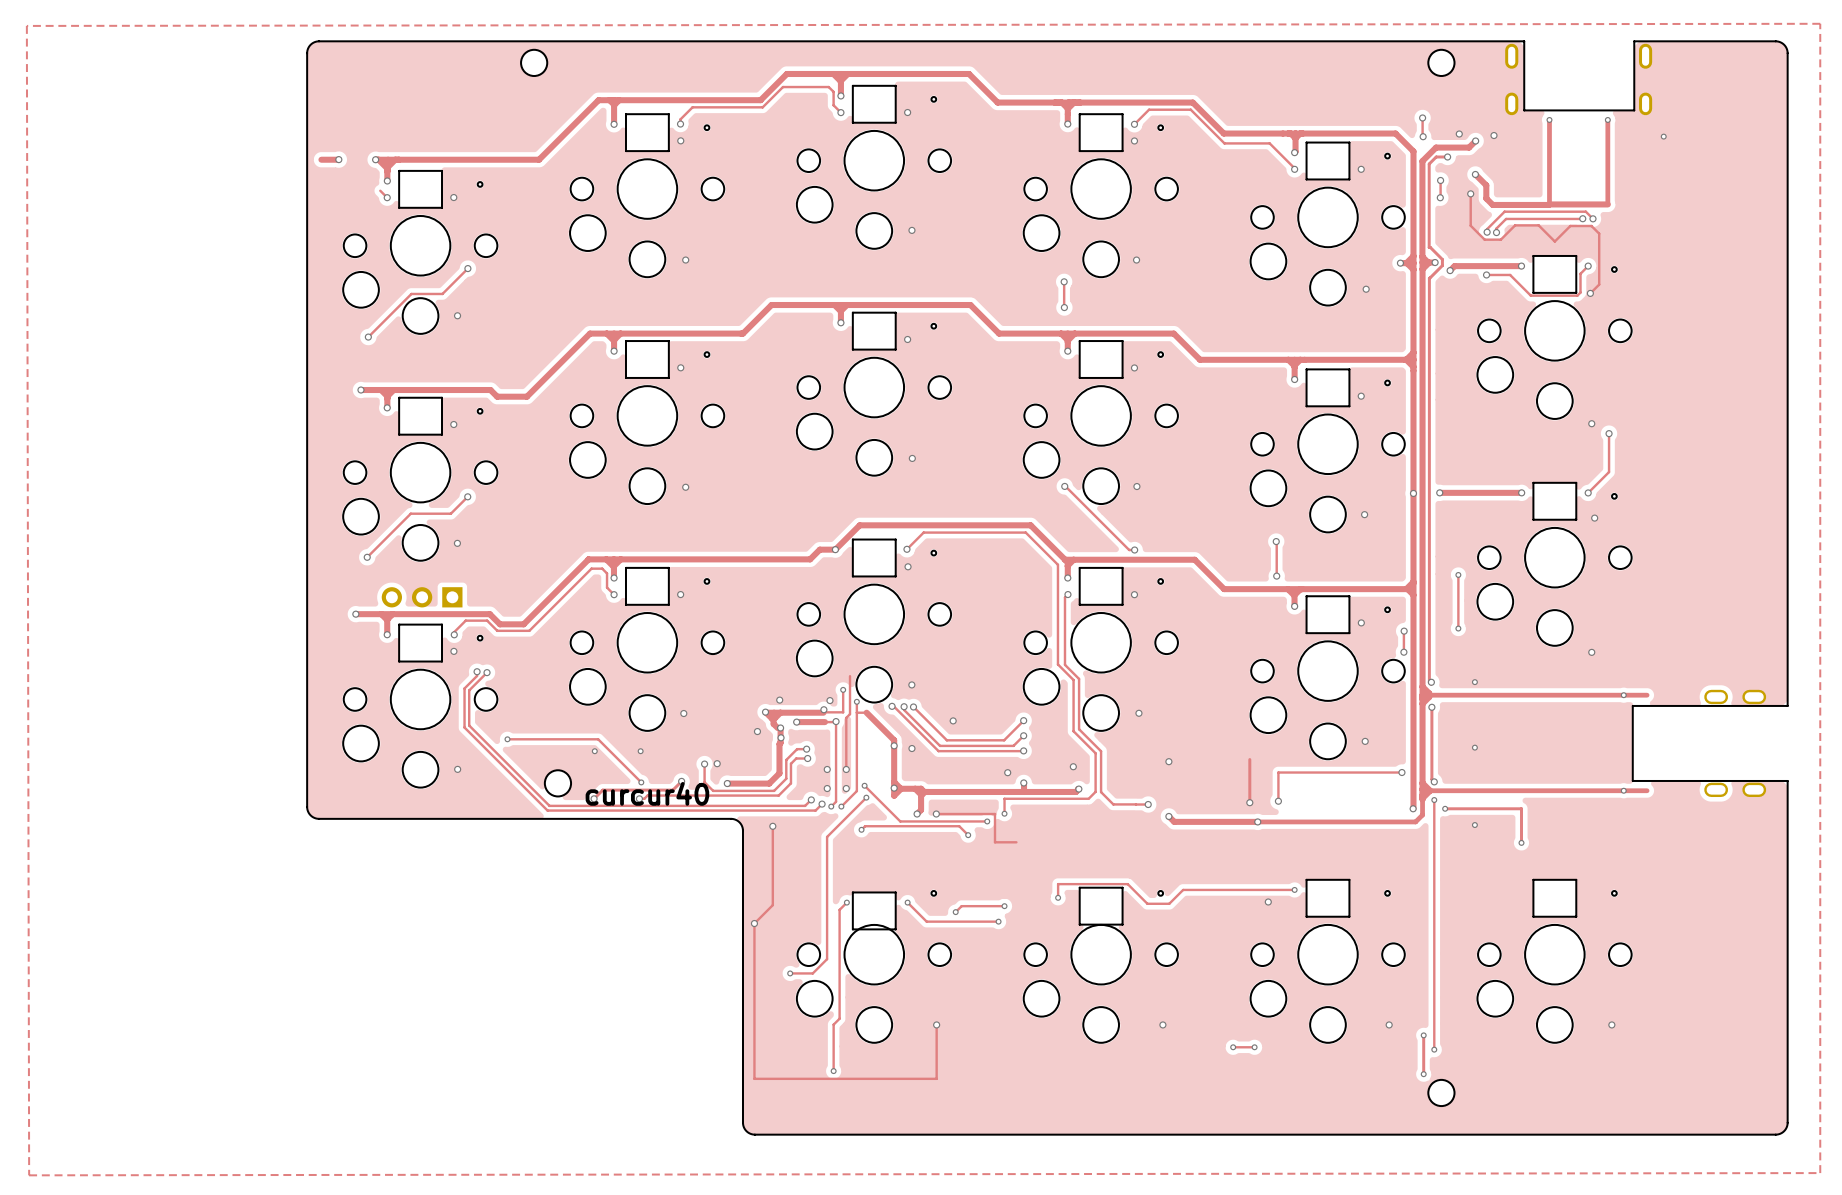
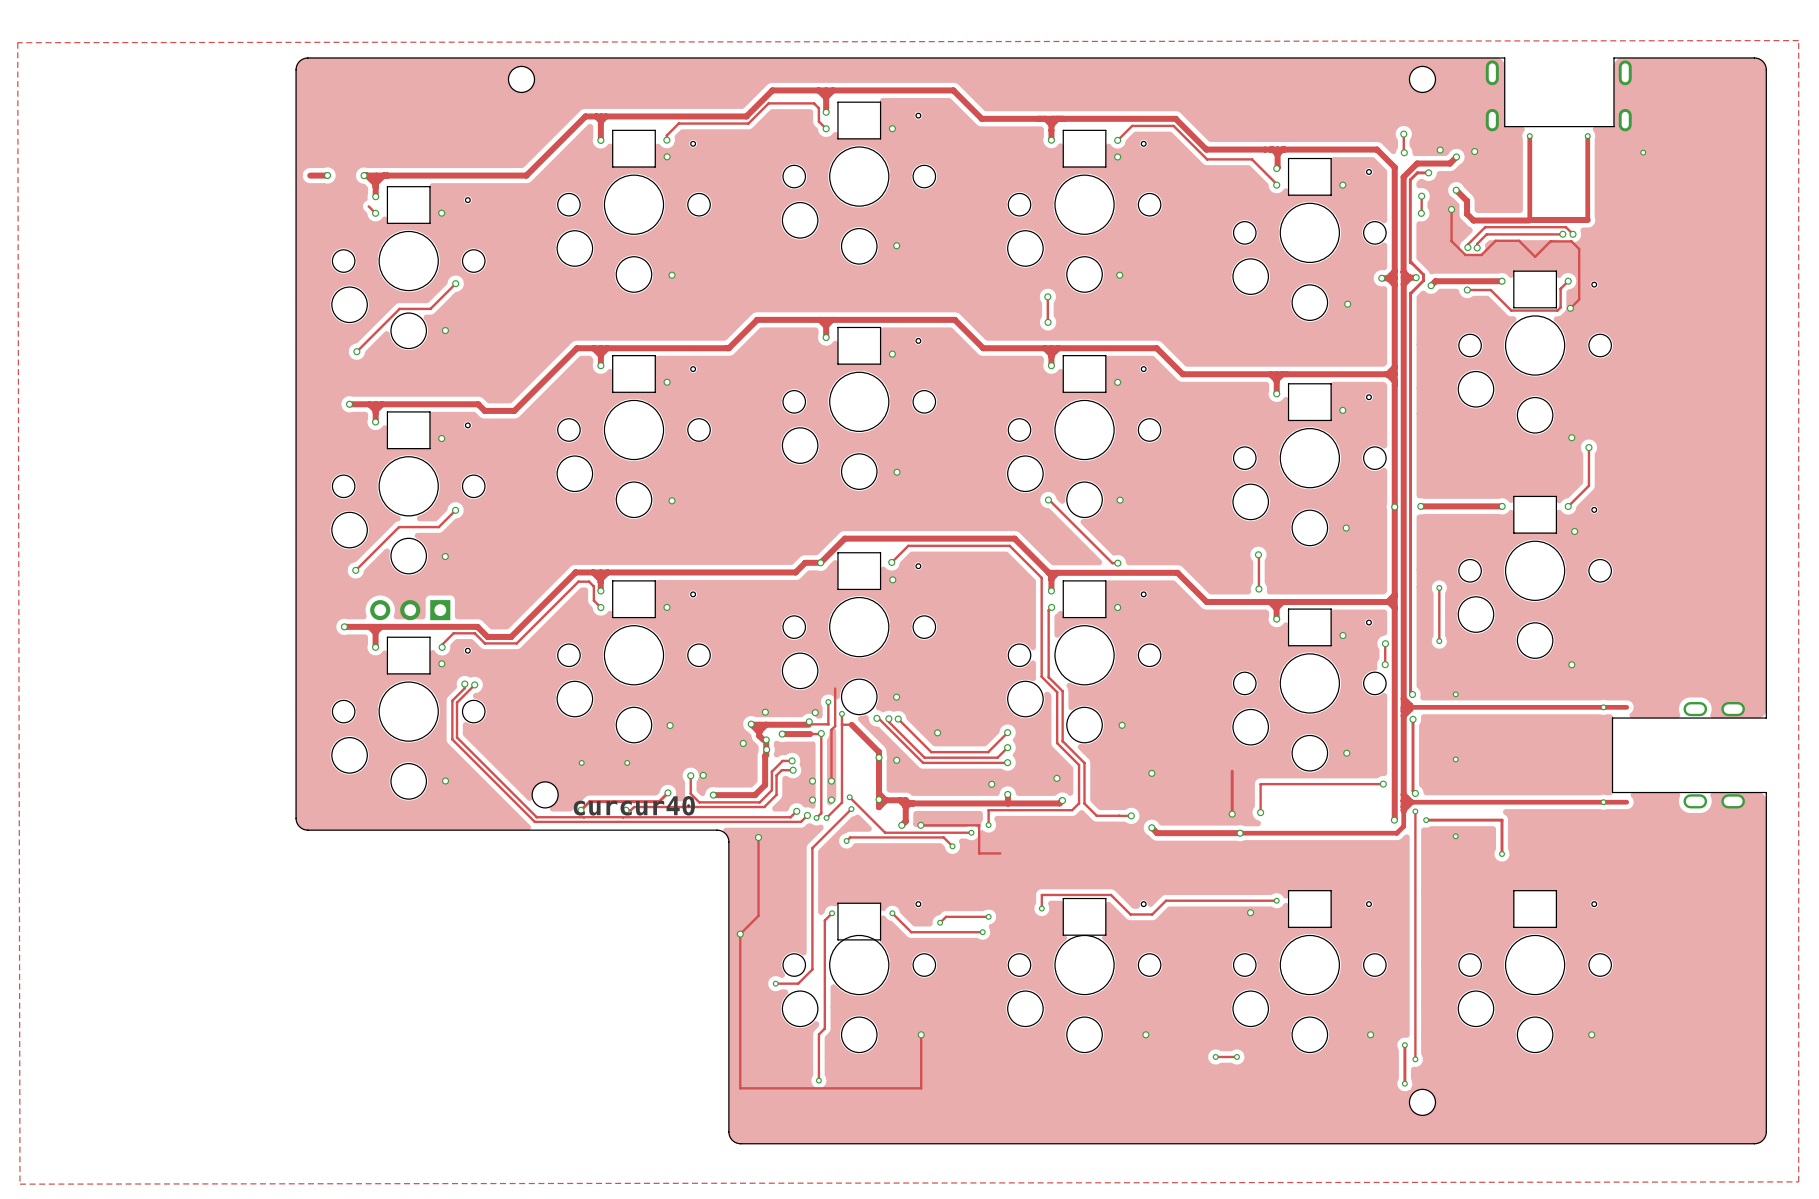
track: (507, 739) (598, 739) (641, 782) -> none
via: (507, 739) -> none
via: (641, 782) -> none

